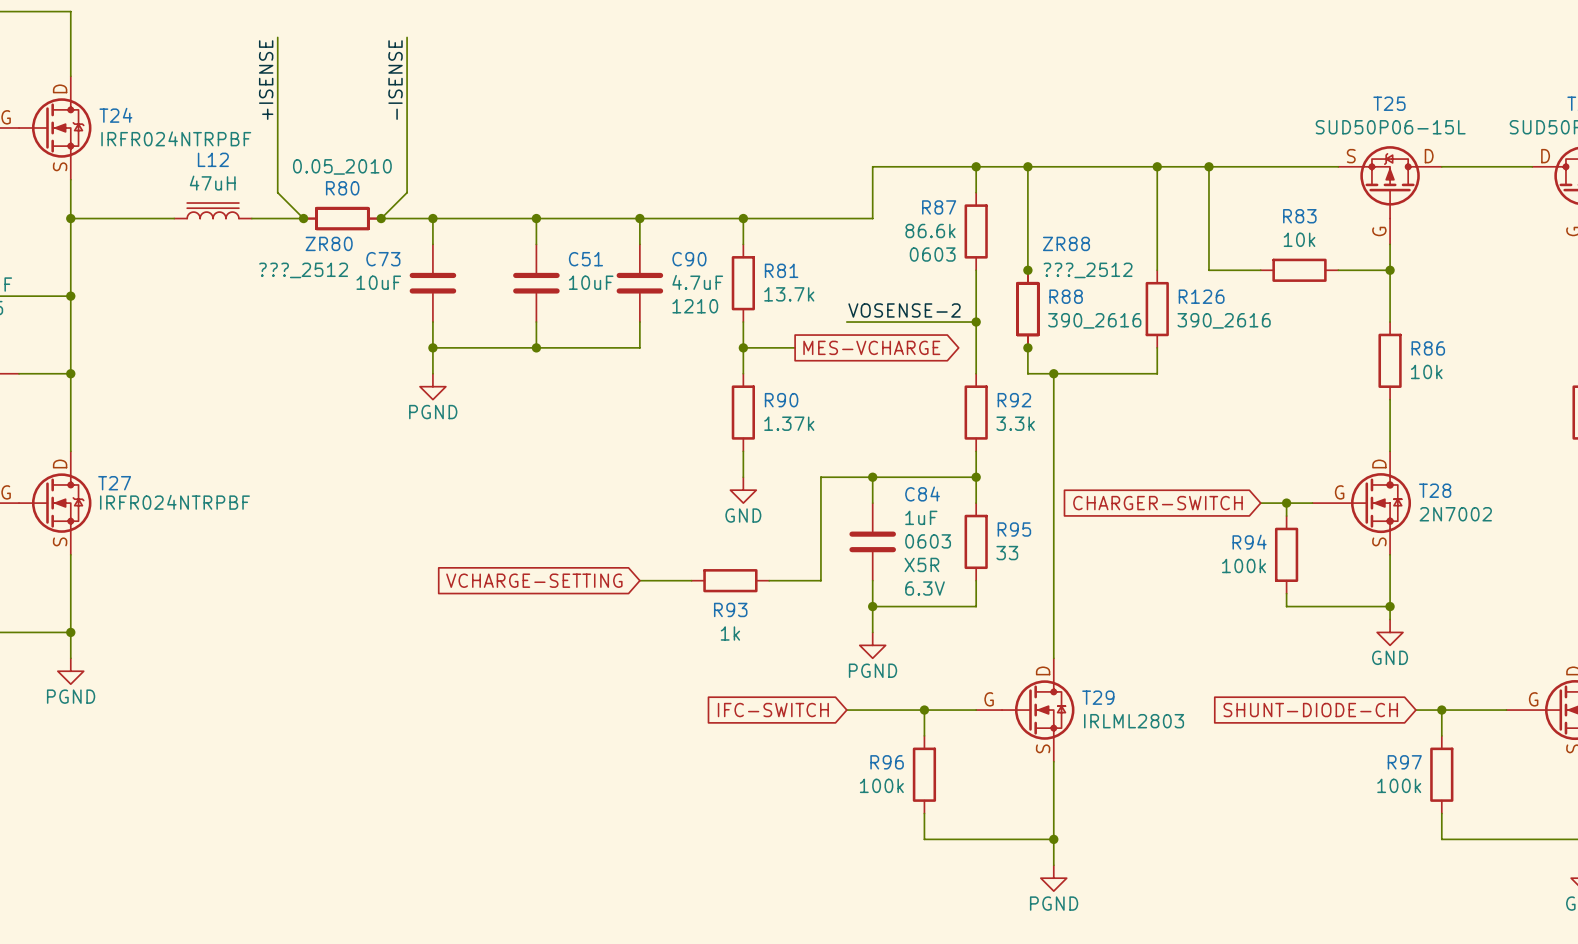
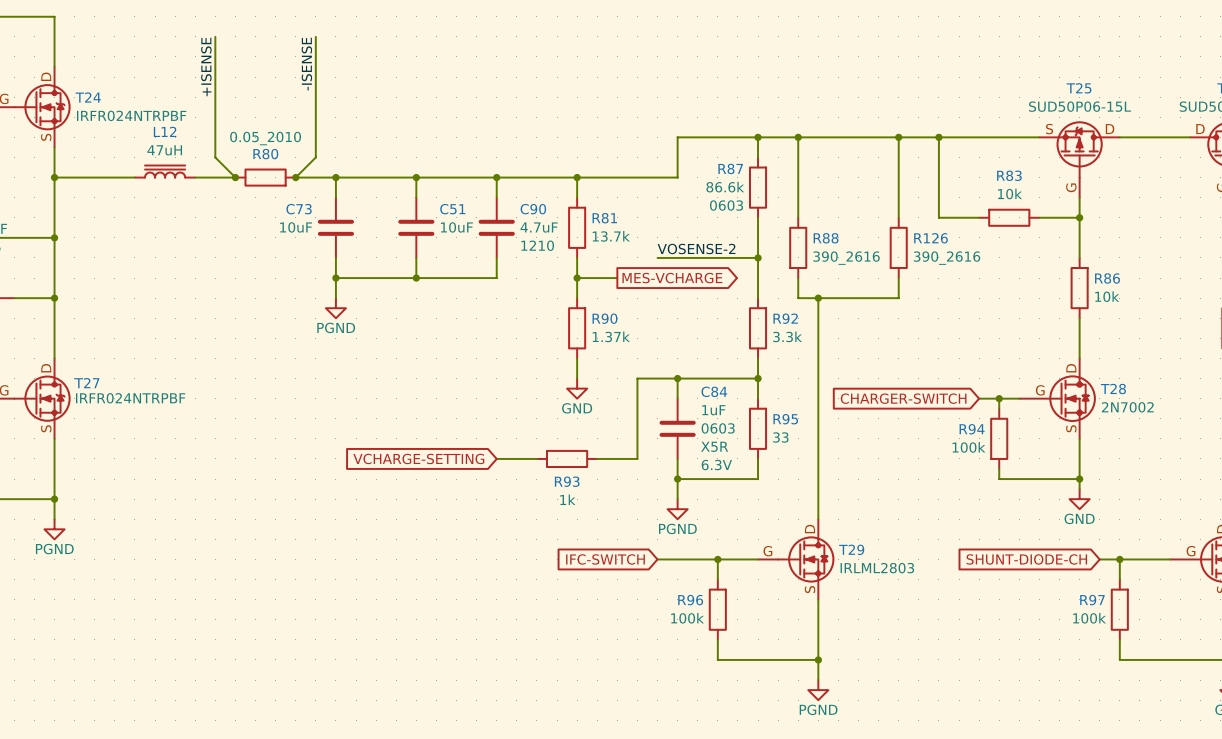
ZR80: ???_2512 (342, 218) -> none
junction: (1027, 270) -> none
ZR88: ???_2512 (1027, 309) -> none
junction: (1027, 347) -> none

